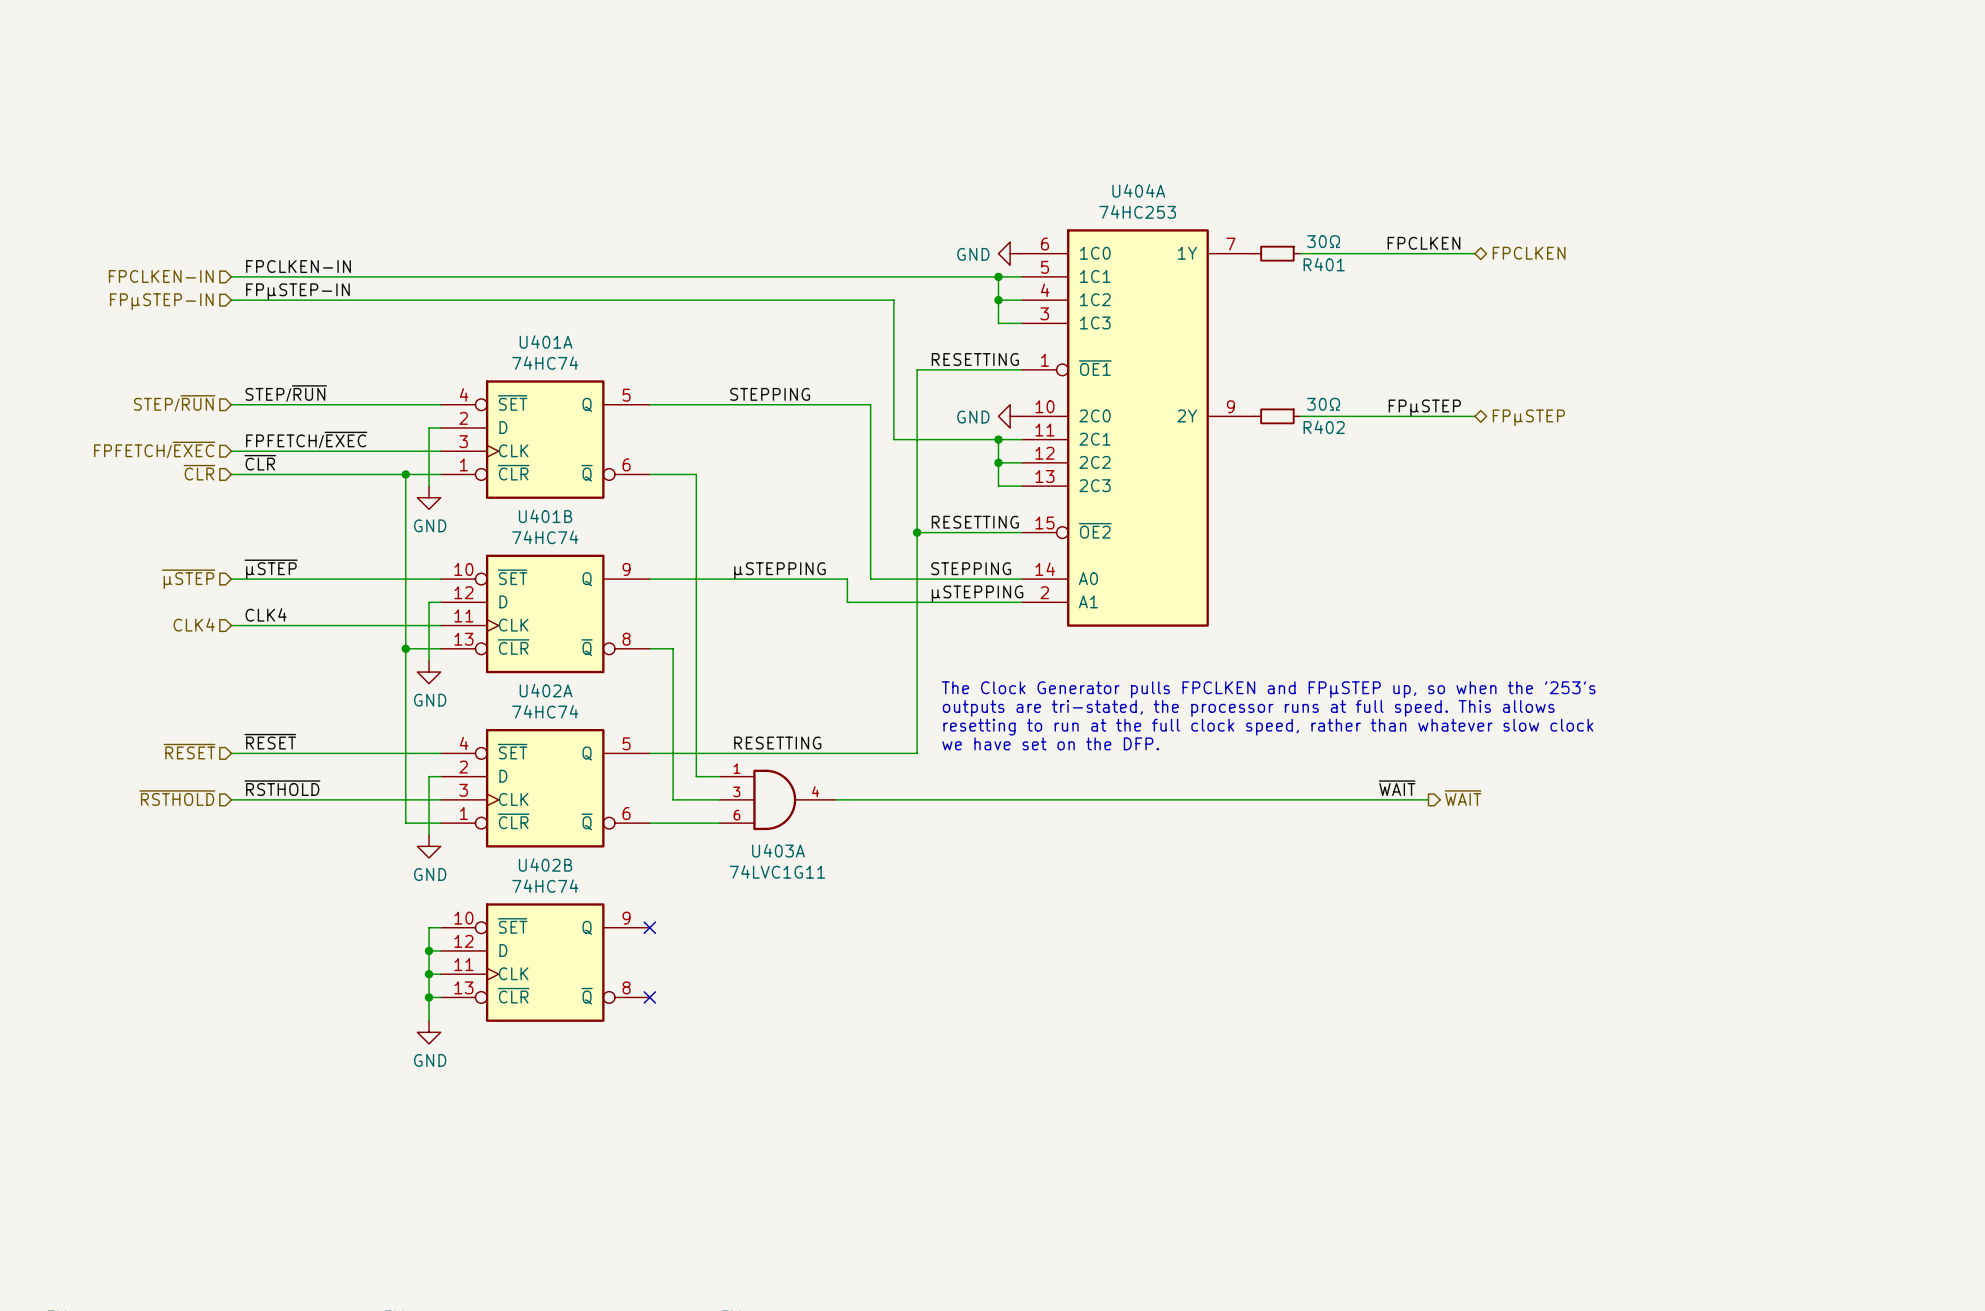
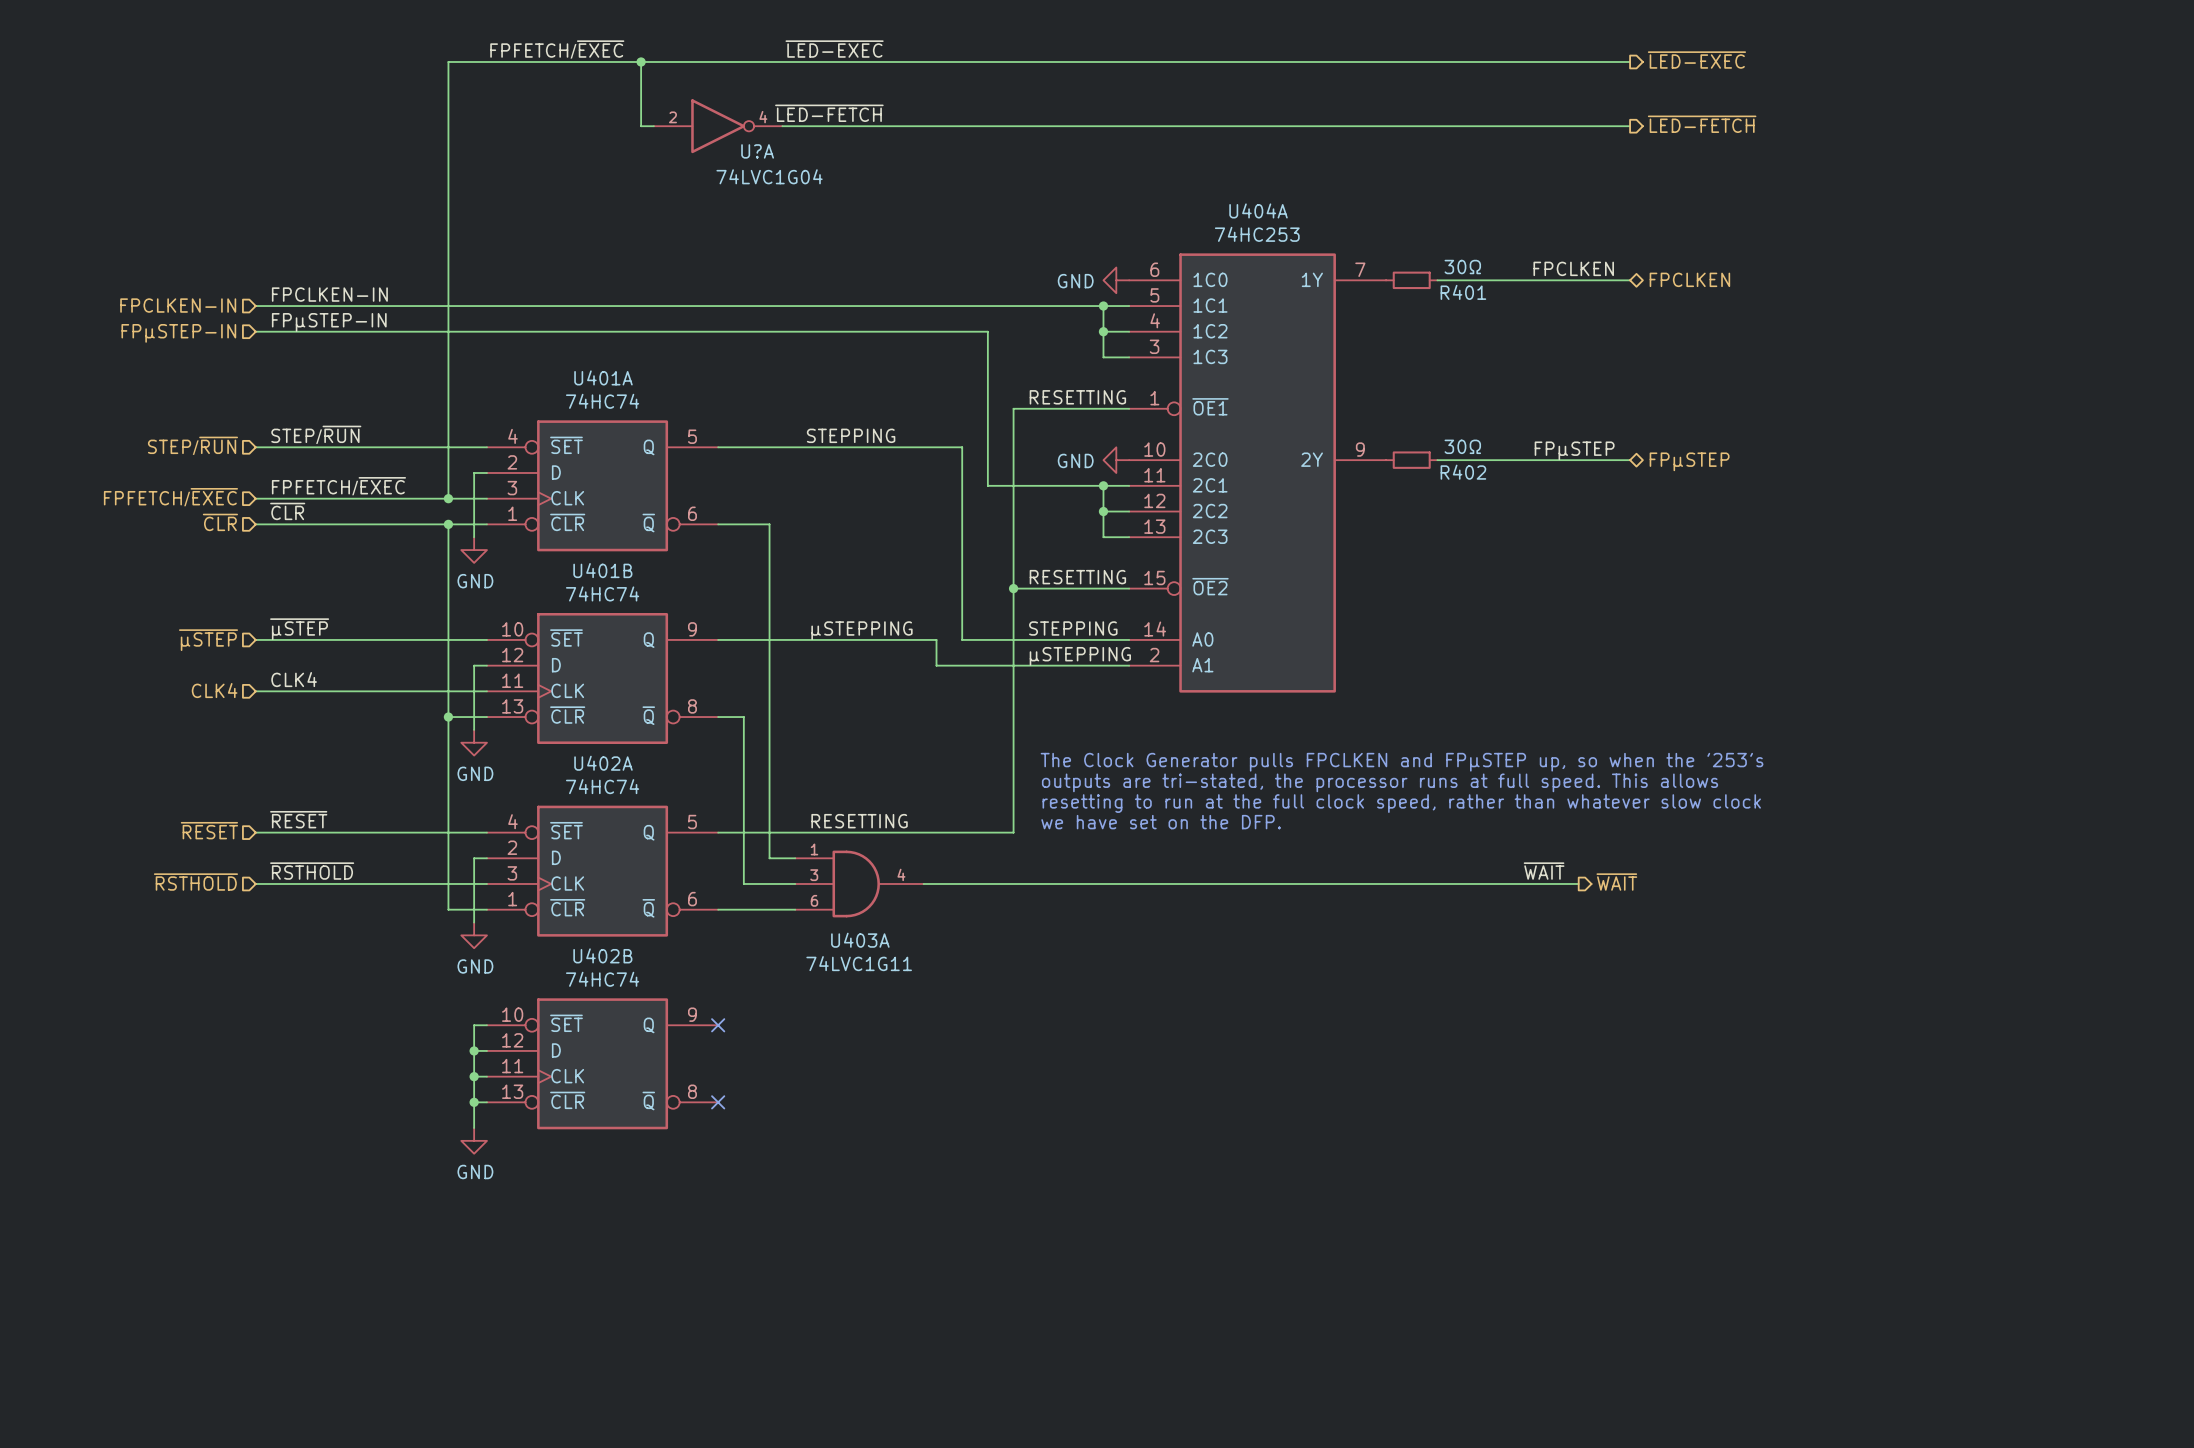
label: none -> ~{LED-EXEC} (834, 49)
label: none -> FPFETCH∕~{EXEC} (557, 49)
hierarchical label: none -> ~{LED-EXEC} (1696, 60)
wire: none -> (641, 61) (641, 126) (653, 126)
junction: none -> (641, 61)
wire: none -> (1630, 61) (448, 61) (448, 498)
label: none -> ~{LED-FETCH} (829, 113)
hierarchical label: none -> ~{LED-FETCH} (1702, 124)
U?A: none -> 74LVC1G04 (718, 126)
wire: none -> (782, 126) (1630, 126)
junction: none -> (448, 498)

